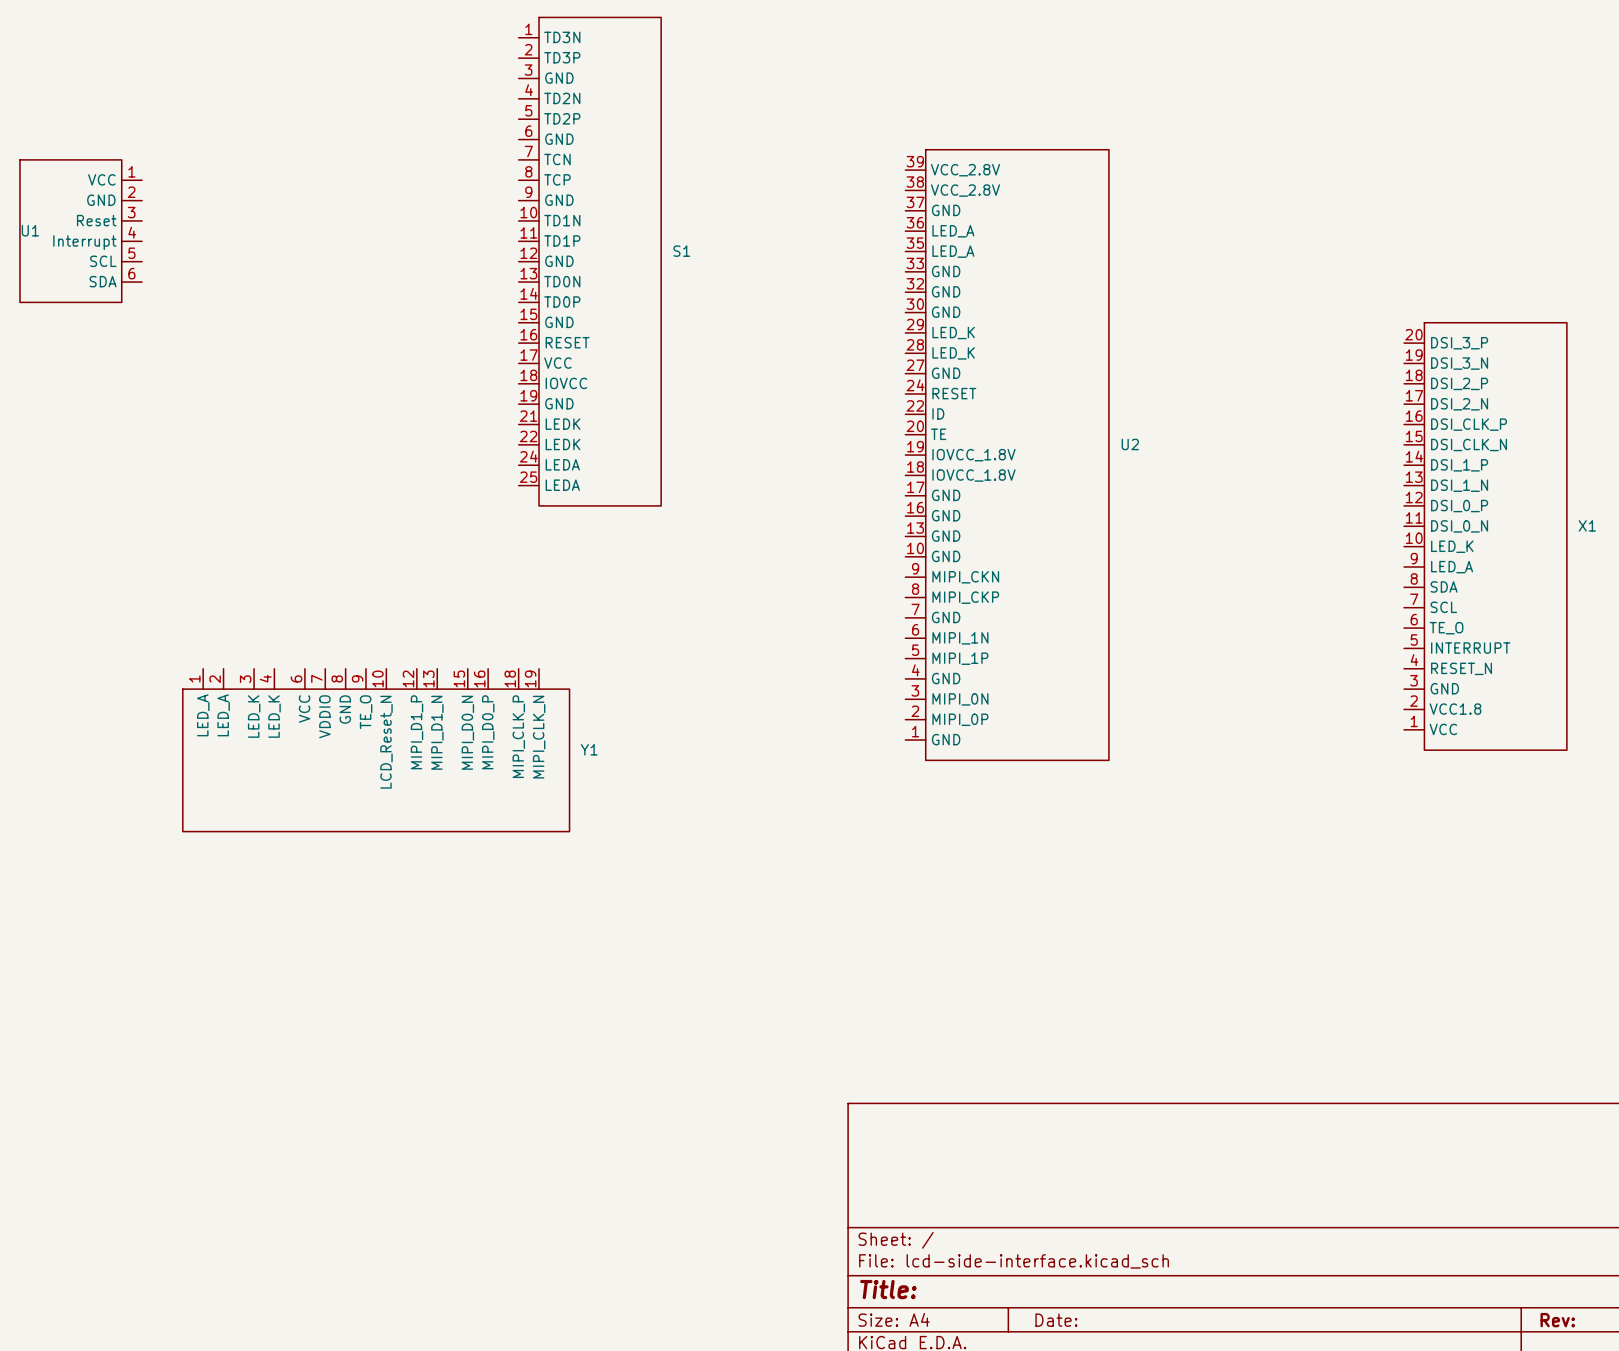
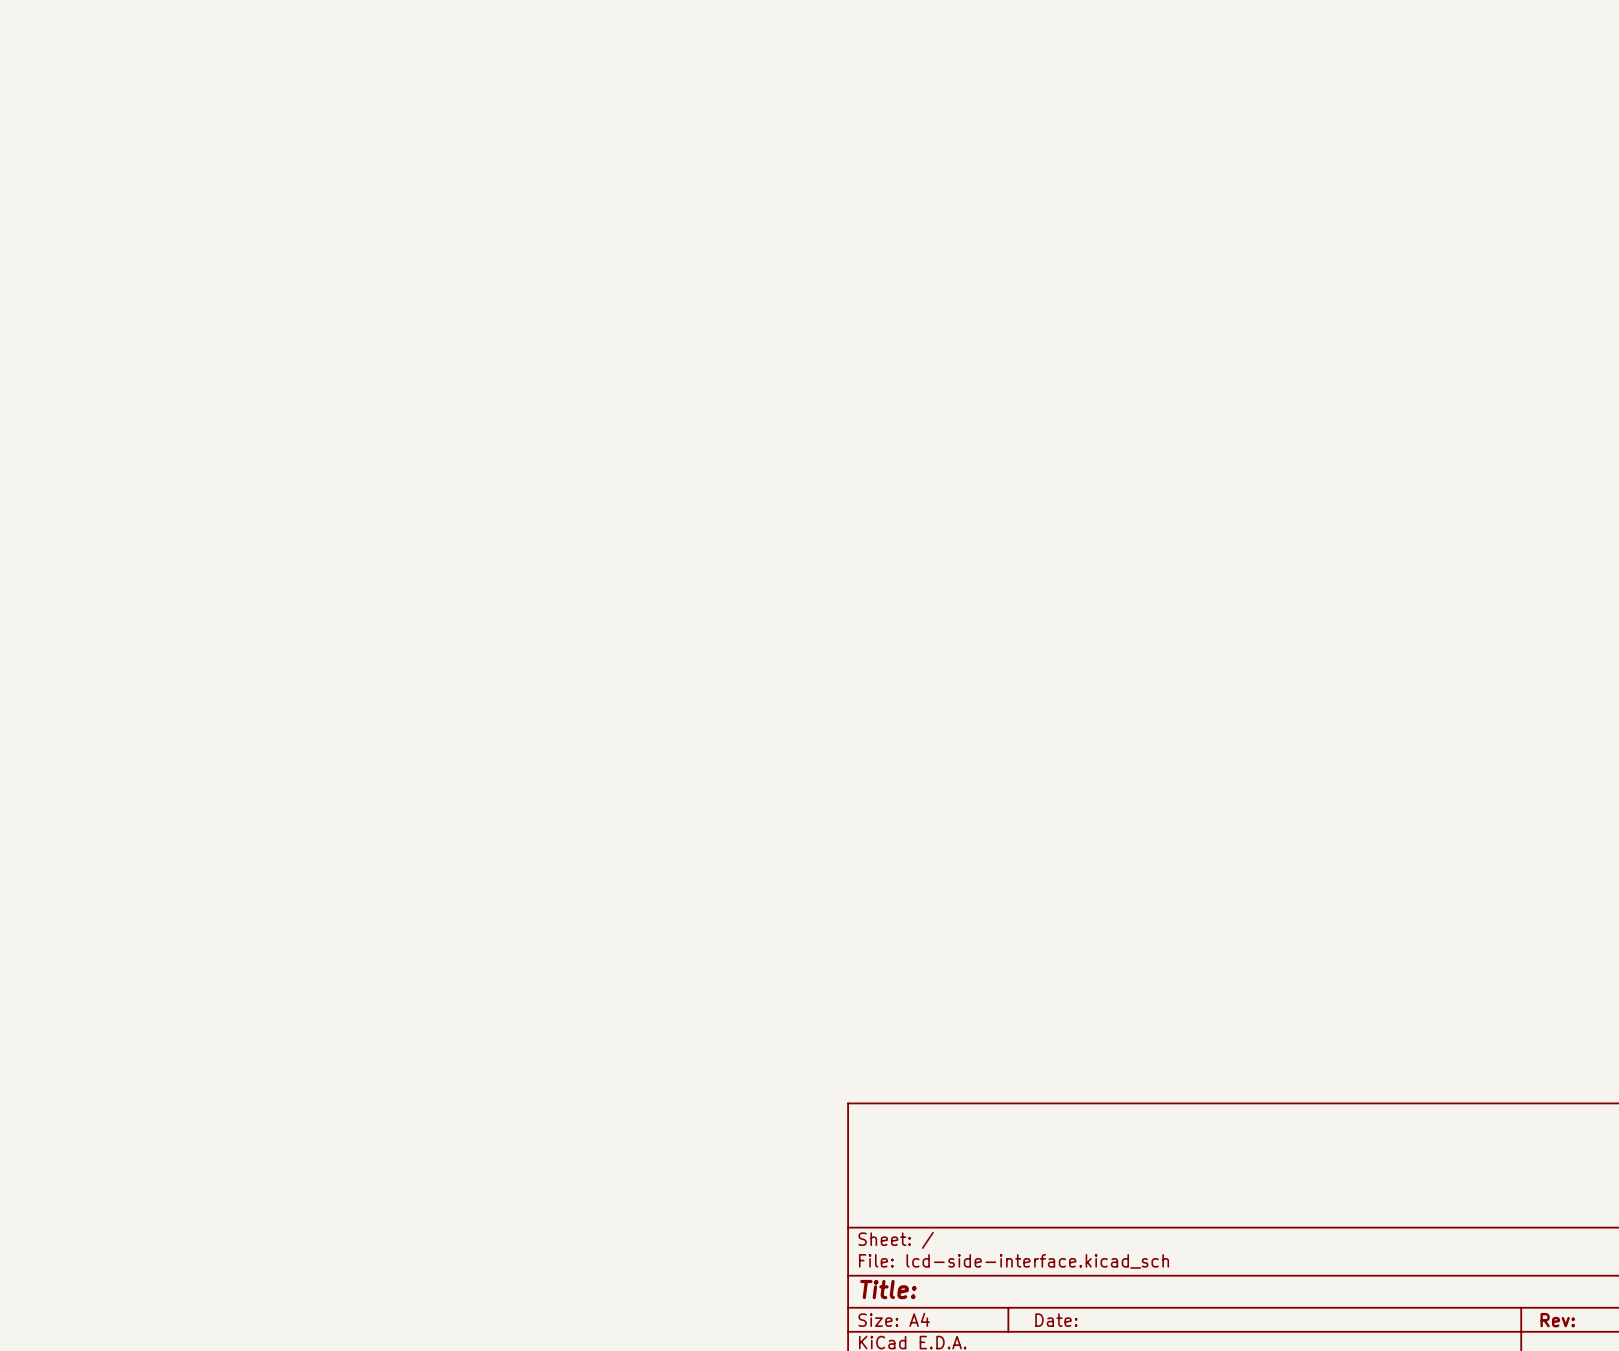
U1: (81, 231) -> none
S1: (589, 261) -> none
U2: (1007, 455) -> none
X1: (1485, 536) -> none
Y1: (376, 750) -> none

